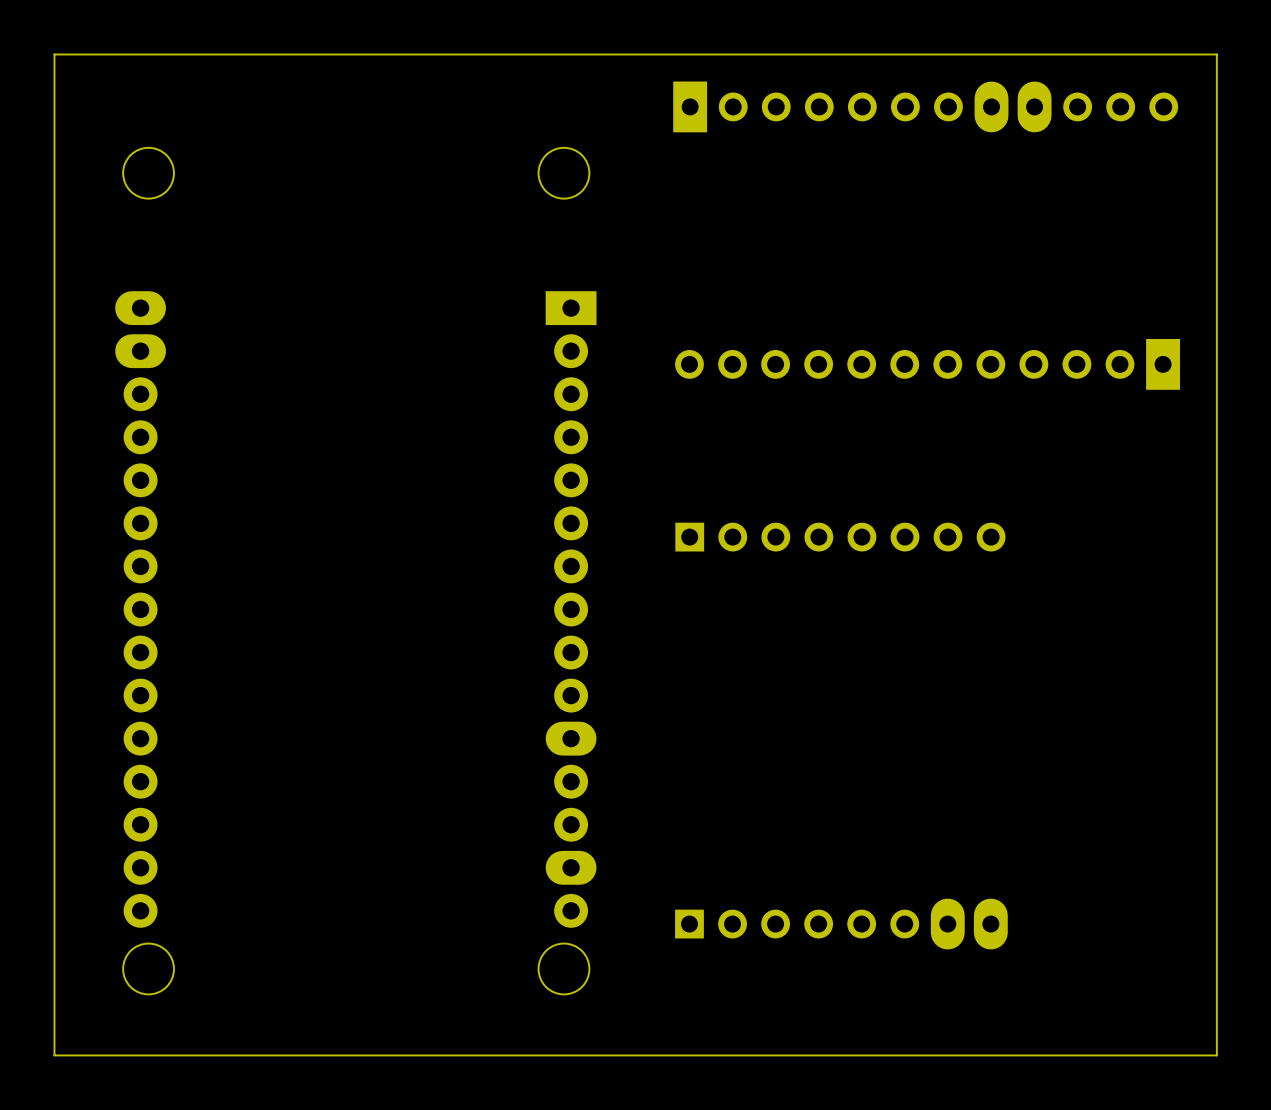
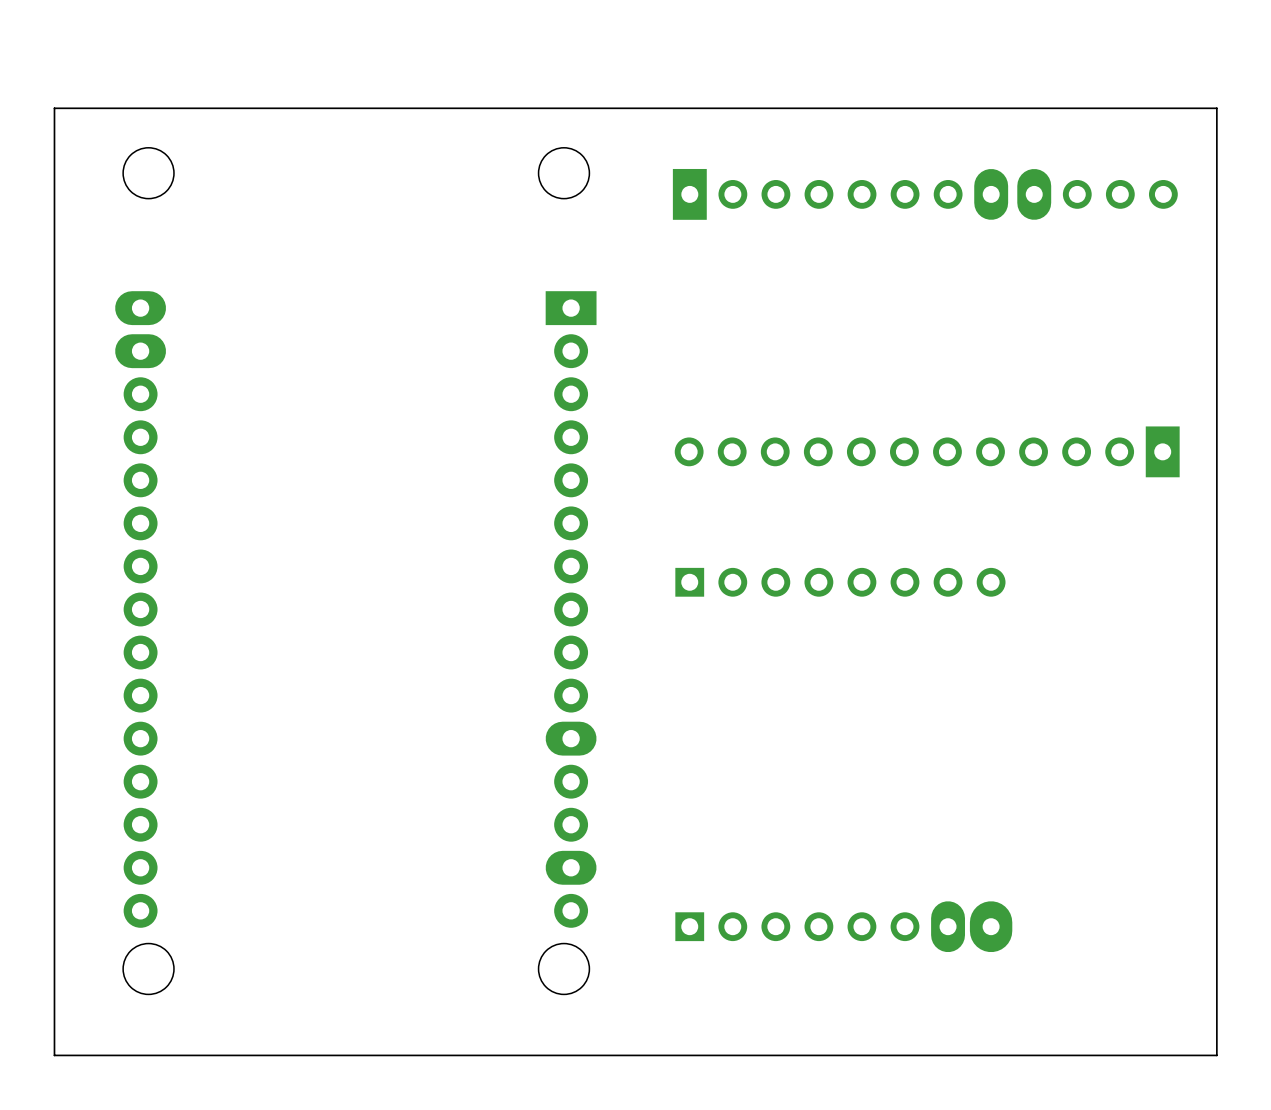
part position: (925, 106) -> (925, 194)
board edge: (1216, 108) (1216, 54) (54, 54) (54, 108) -> (1216, 108) (54, 108)
part position: (927, 364) -> (927, 451)
part position: (840, 537) -> (840, 582)
part footprint: [675, 898, 1008, 950] -> [675, 901, 1013, 953]

